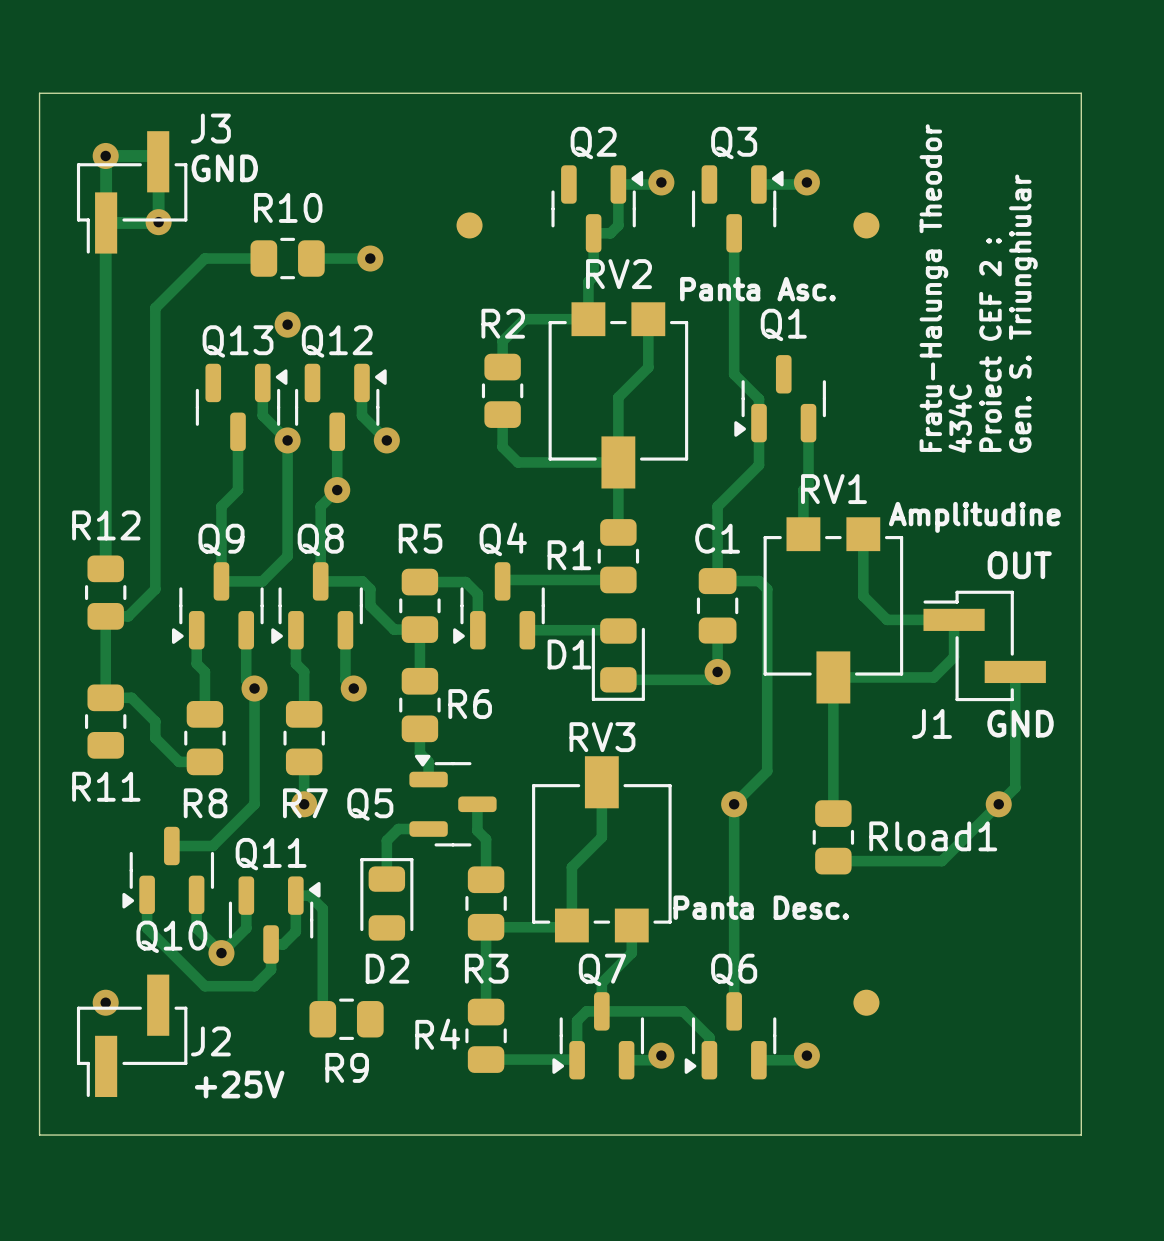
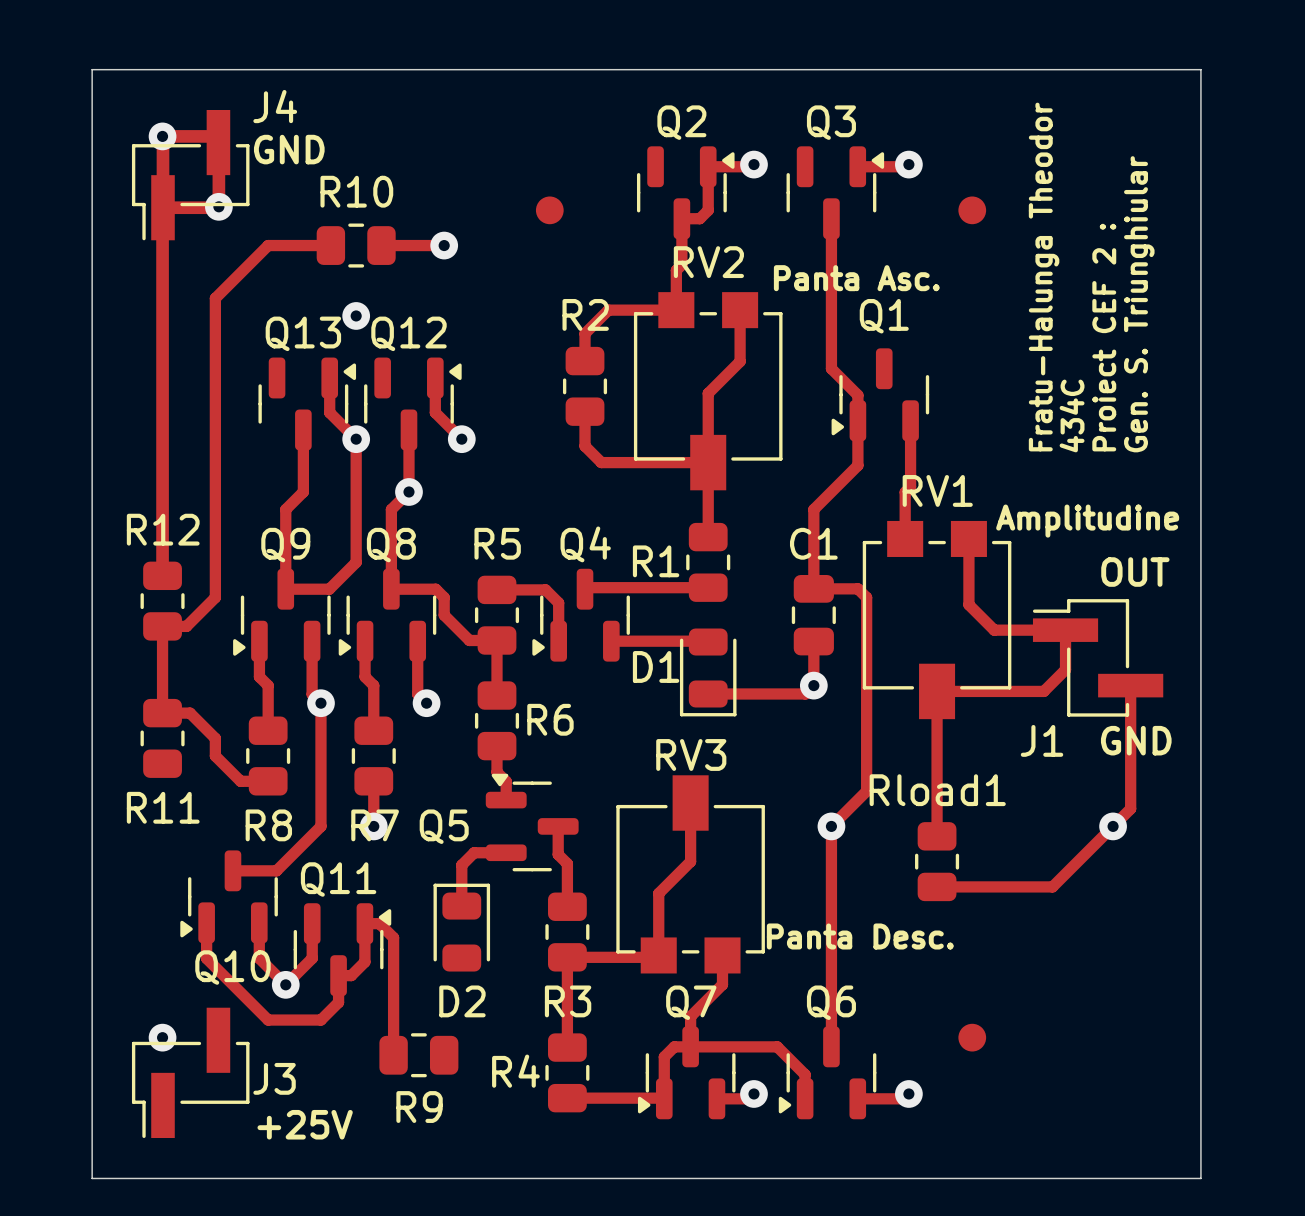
J3 name: J3 (210, 128) -> J4 (275, 106)
Rload1 name position: Rload1 (933, 836) -> Rload1 (937, 790)
J2 name: J2 (210, 1041) -> J3 (274, 1078)

